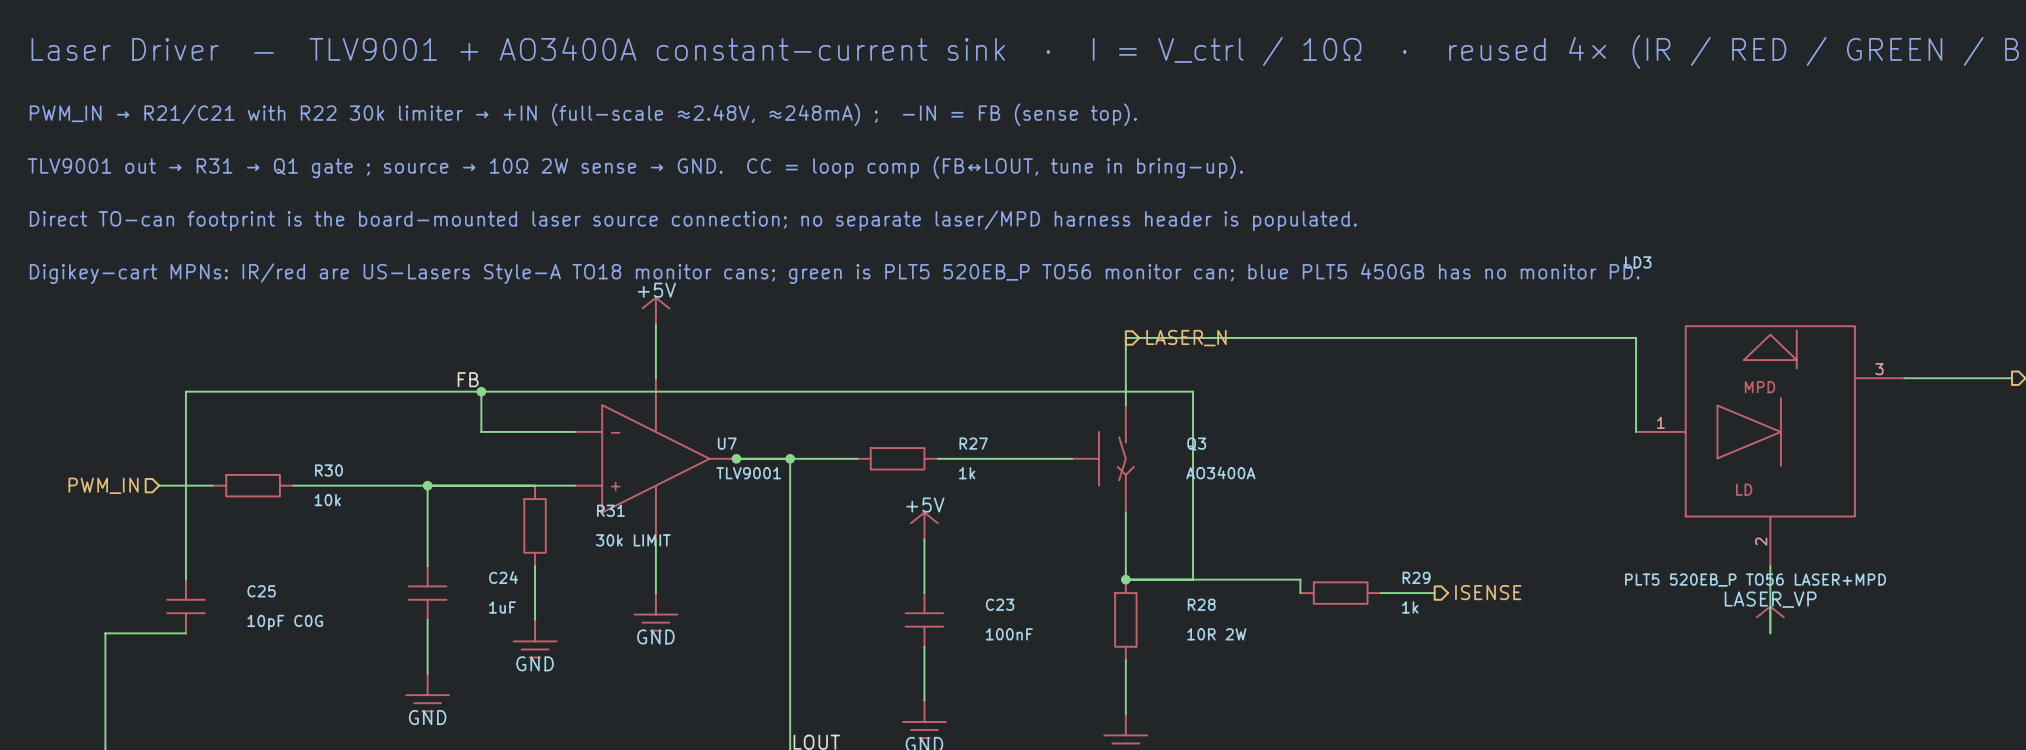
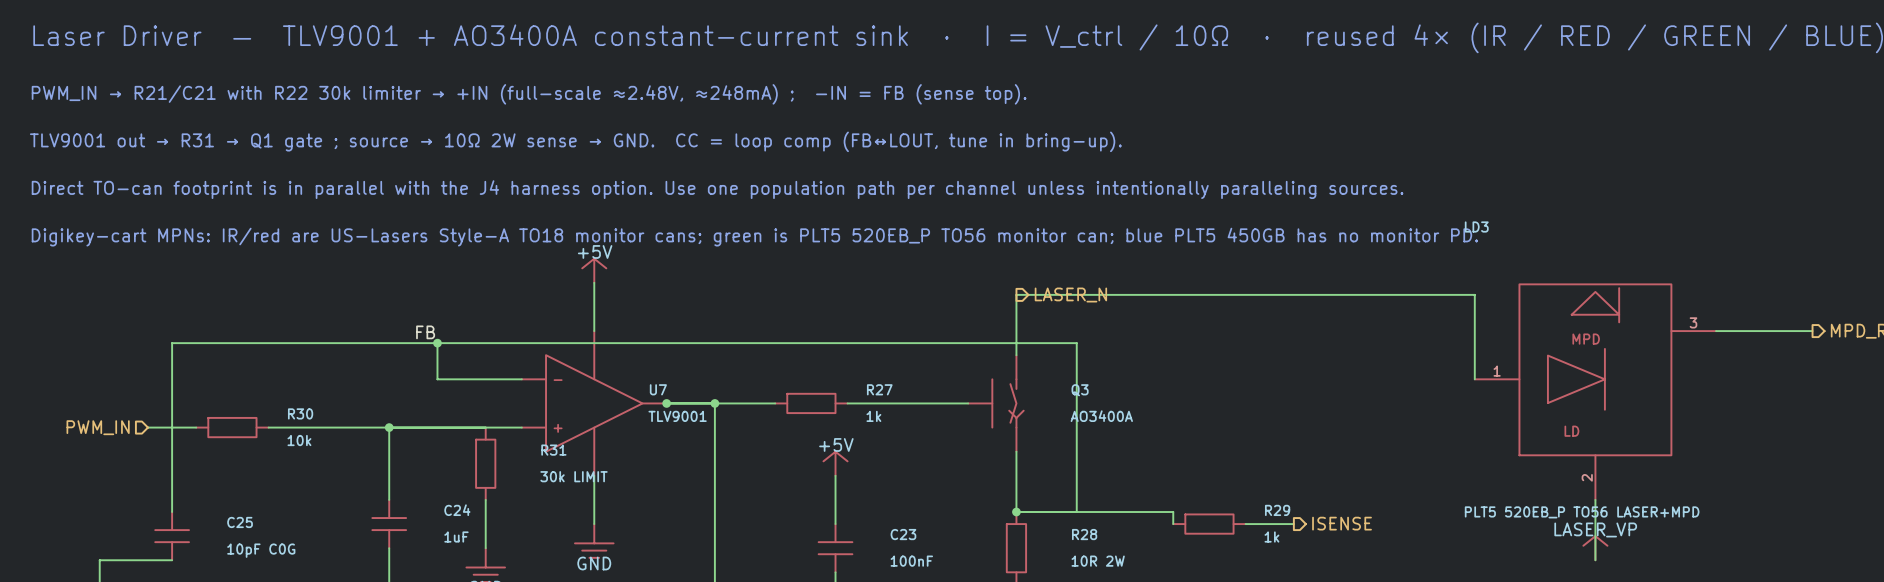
text: Direct TO-can footprint is the board-mounted laser source connection; no separate laser/MPD harness header is populated. (693, 220) -> Direct TO-can footprint is in parallel with the J4 harness option. Use one population path per channel unless intentionally paralleling sources. (717, 189)

